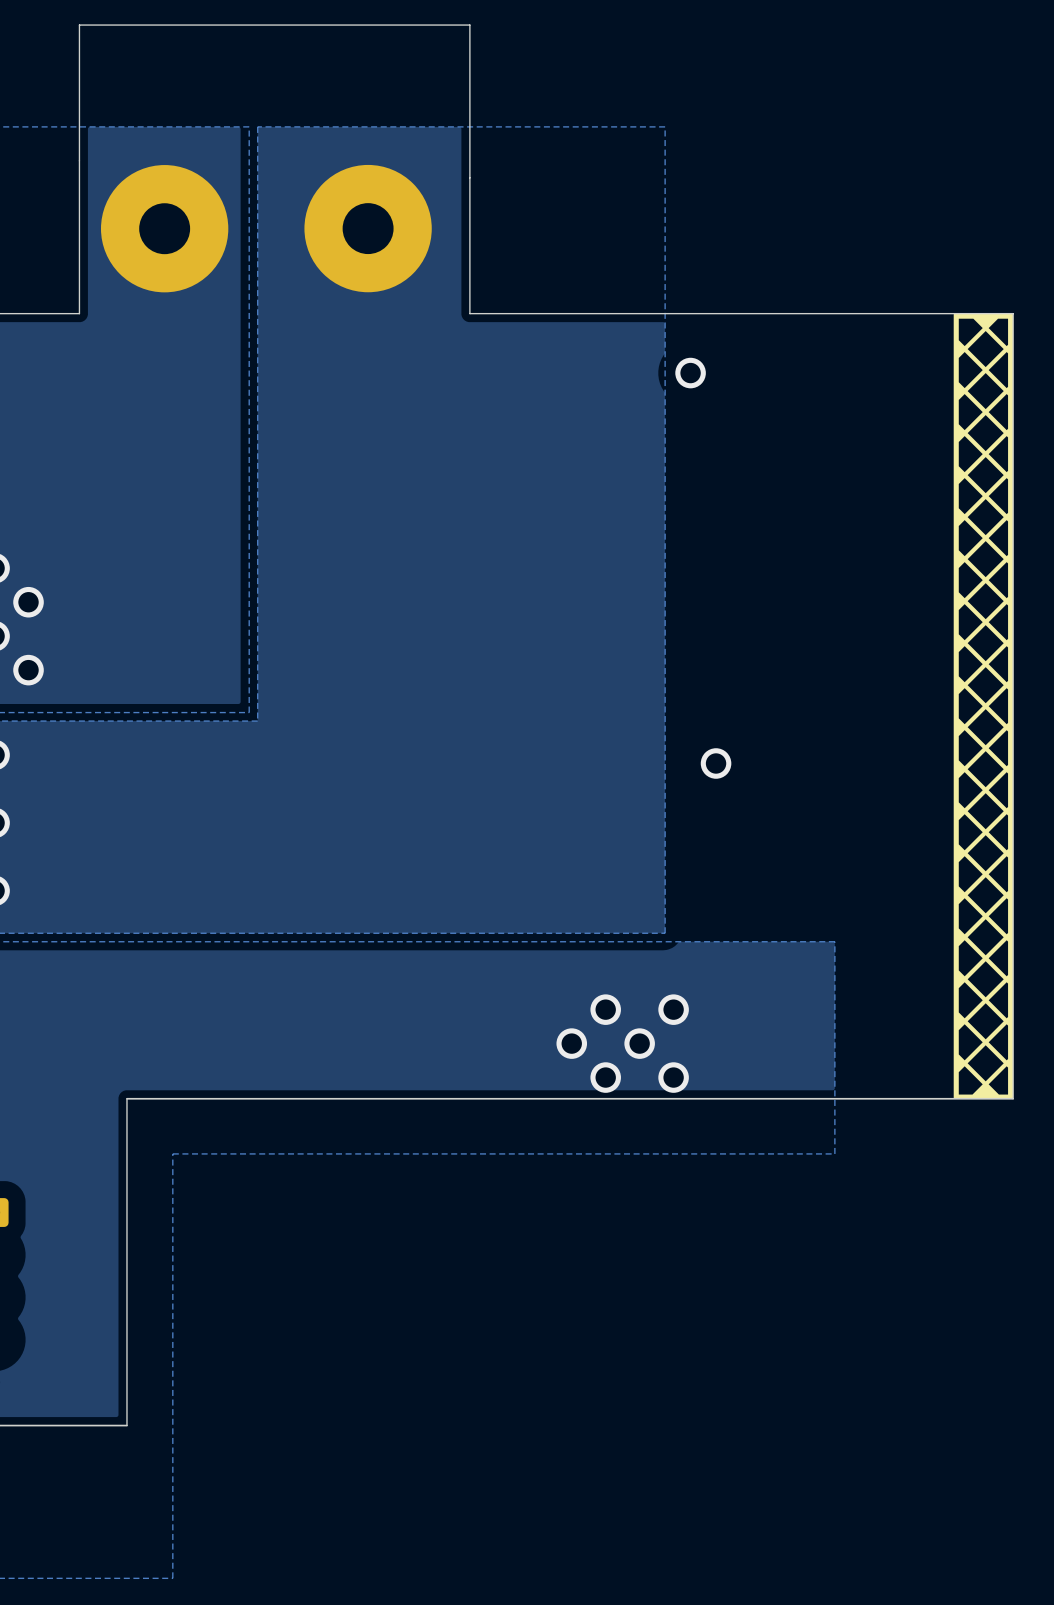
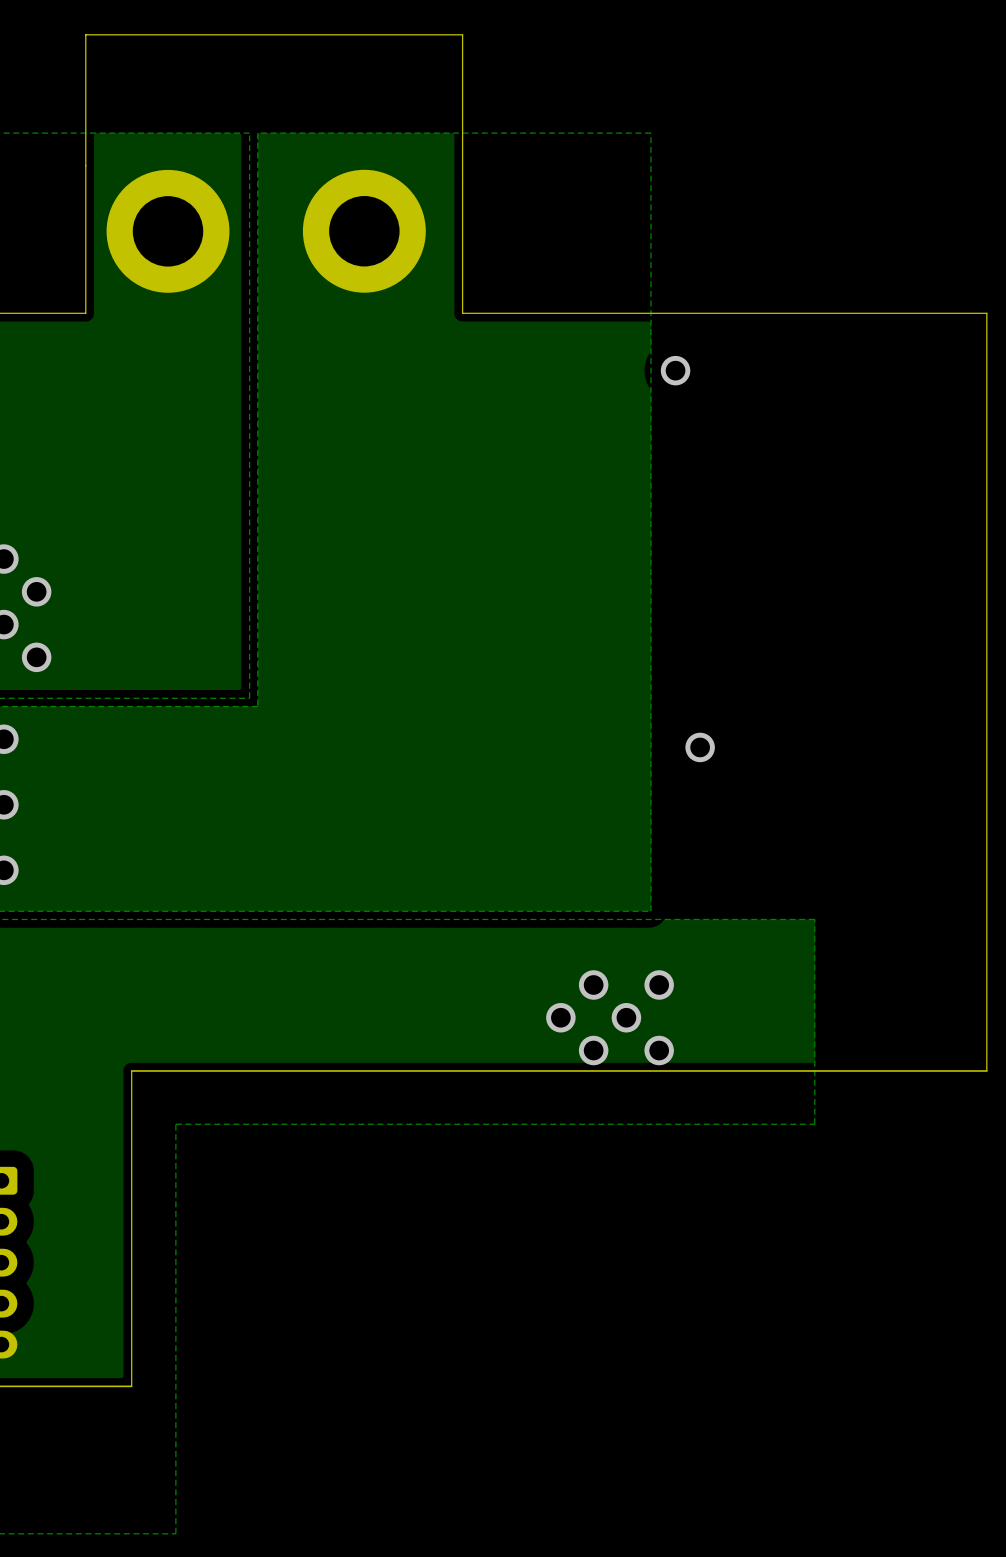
part footprint: [304, 164, 432, 293] -> [302, 169, 426, 293]
part footprint: [100, 165, 229, 293] -> [106, 169, 230, 293]
drawing: [953, 313, 1014, 1099] -> none

